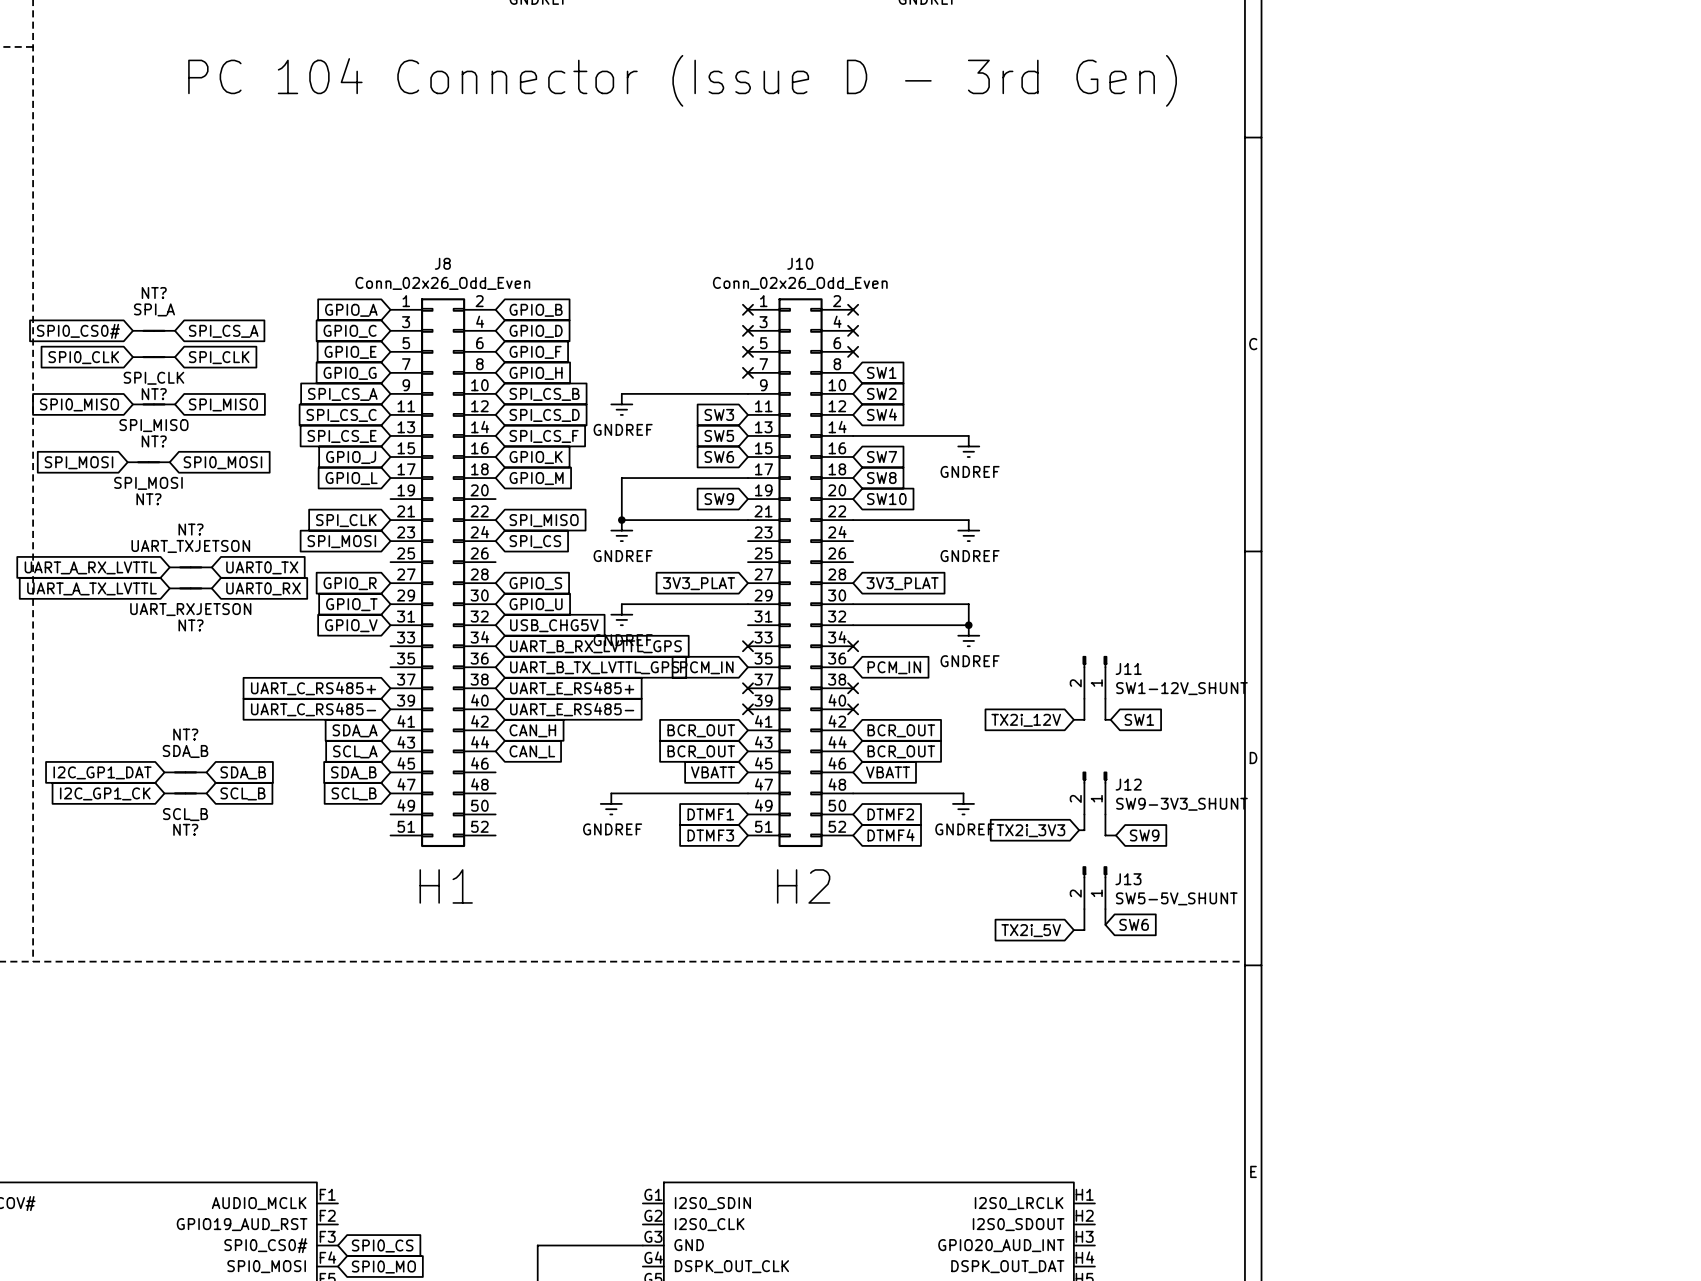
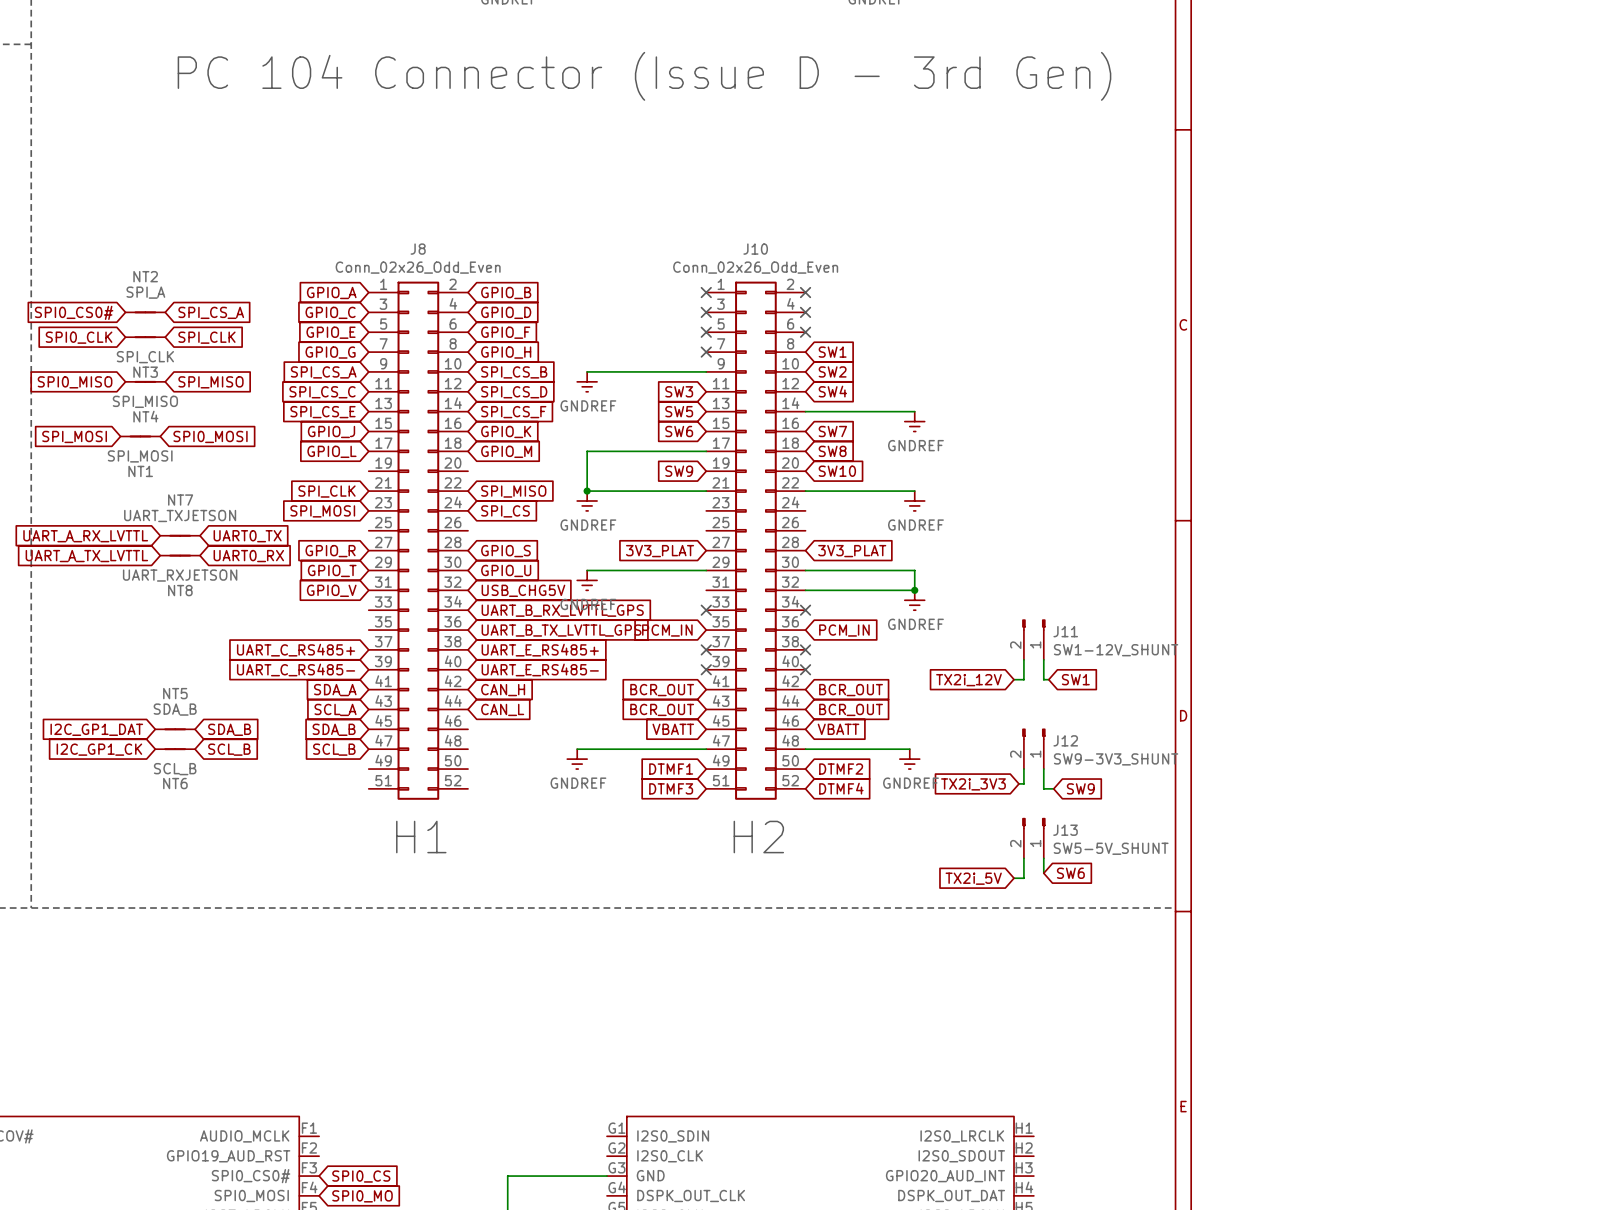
NT? name: NT? (154, 293) -> NT2 (145, 276)
NT? name: NT? (154, 394) -> NT3 (145, 372)
NT? name: NT? (154, 441) -> NT4 (145, 416)
NT? name: NT? (148, 499) -> NT1 (140, 471)
NT? name: NT? (191, 529) -> NT7 (180, 500)
NT? name: NT? (191, 625) -> NT8 (180, 590)
NT? name: NT? (185, 734) -> NT5 (175, 693)
NT? name: NT? (185, 829) -> NT6 (175, 783)

